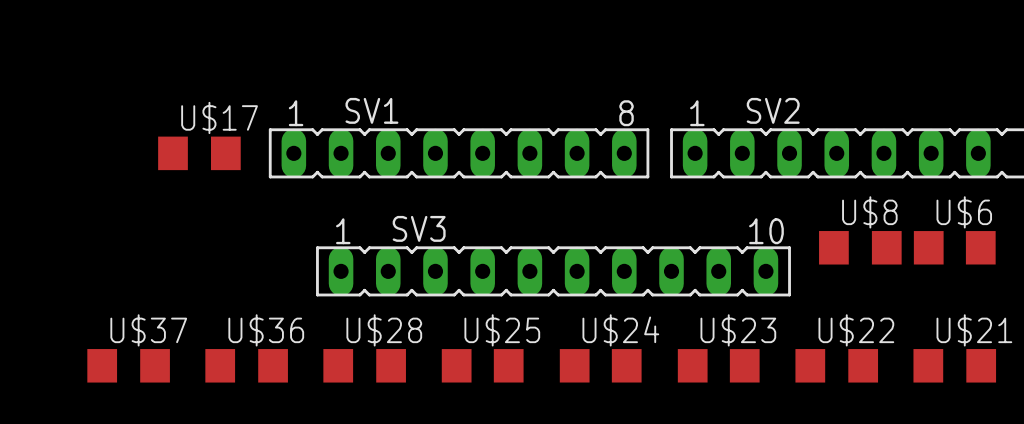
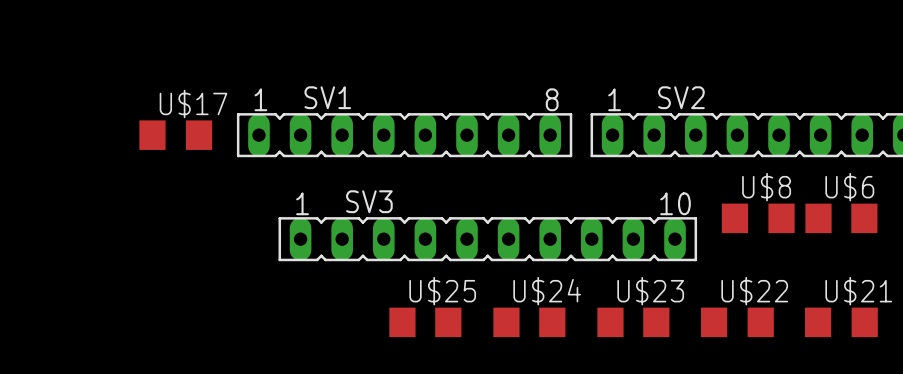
U$37: (128, 365) -> none
U$36: (246, 365) -> none
U$28: (364, 365) -> none

